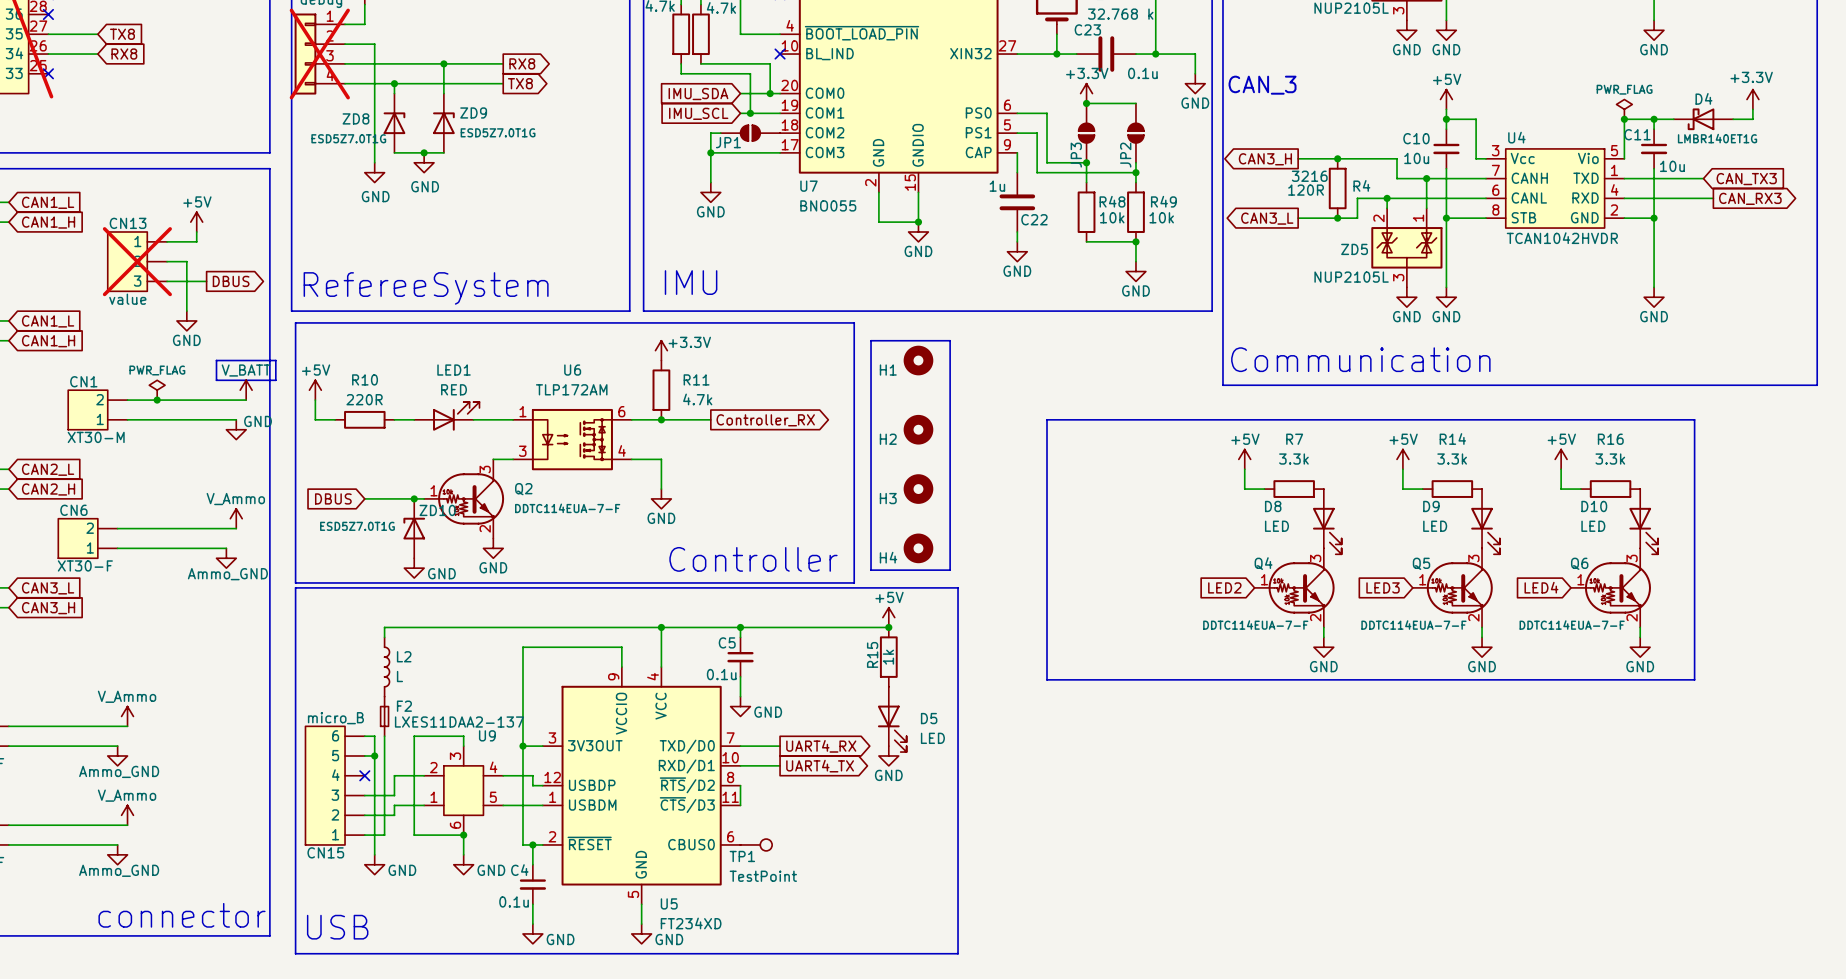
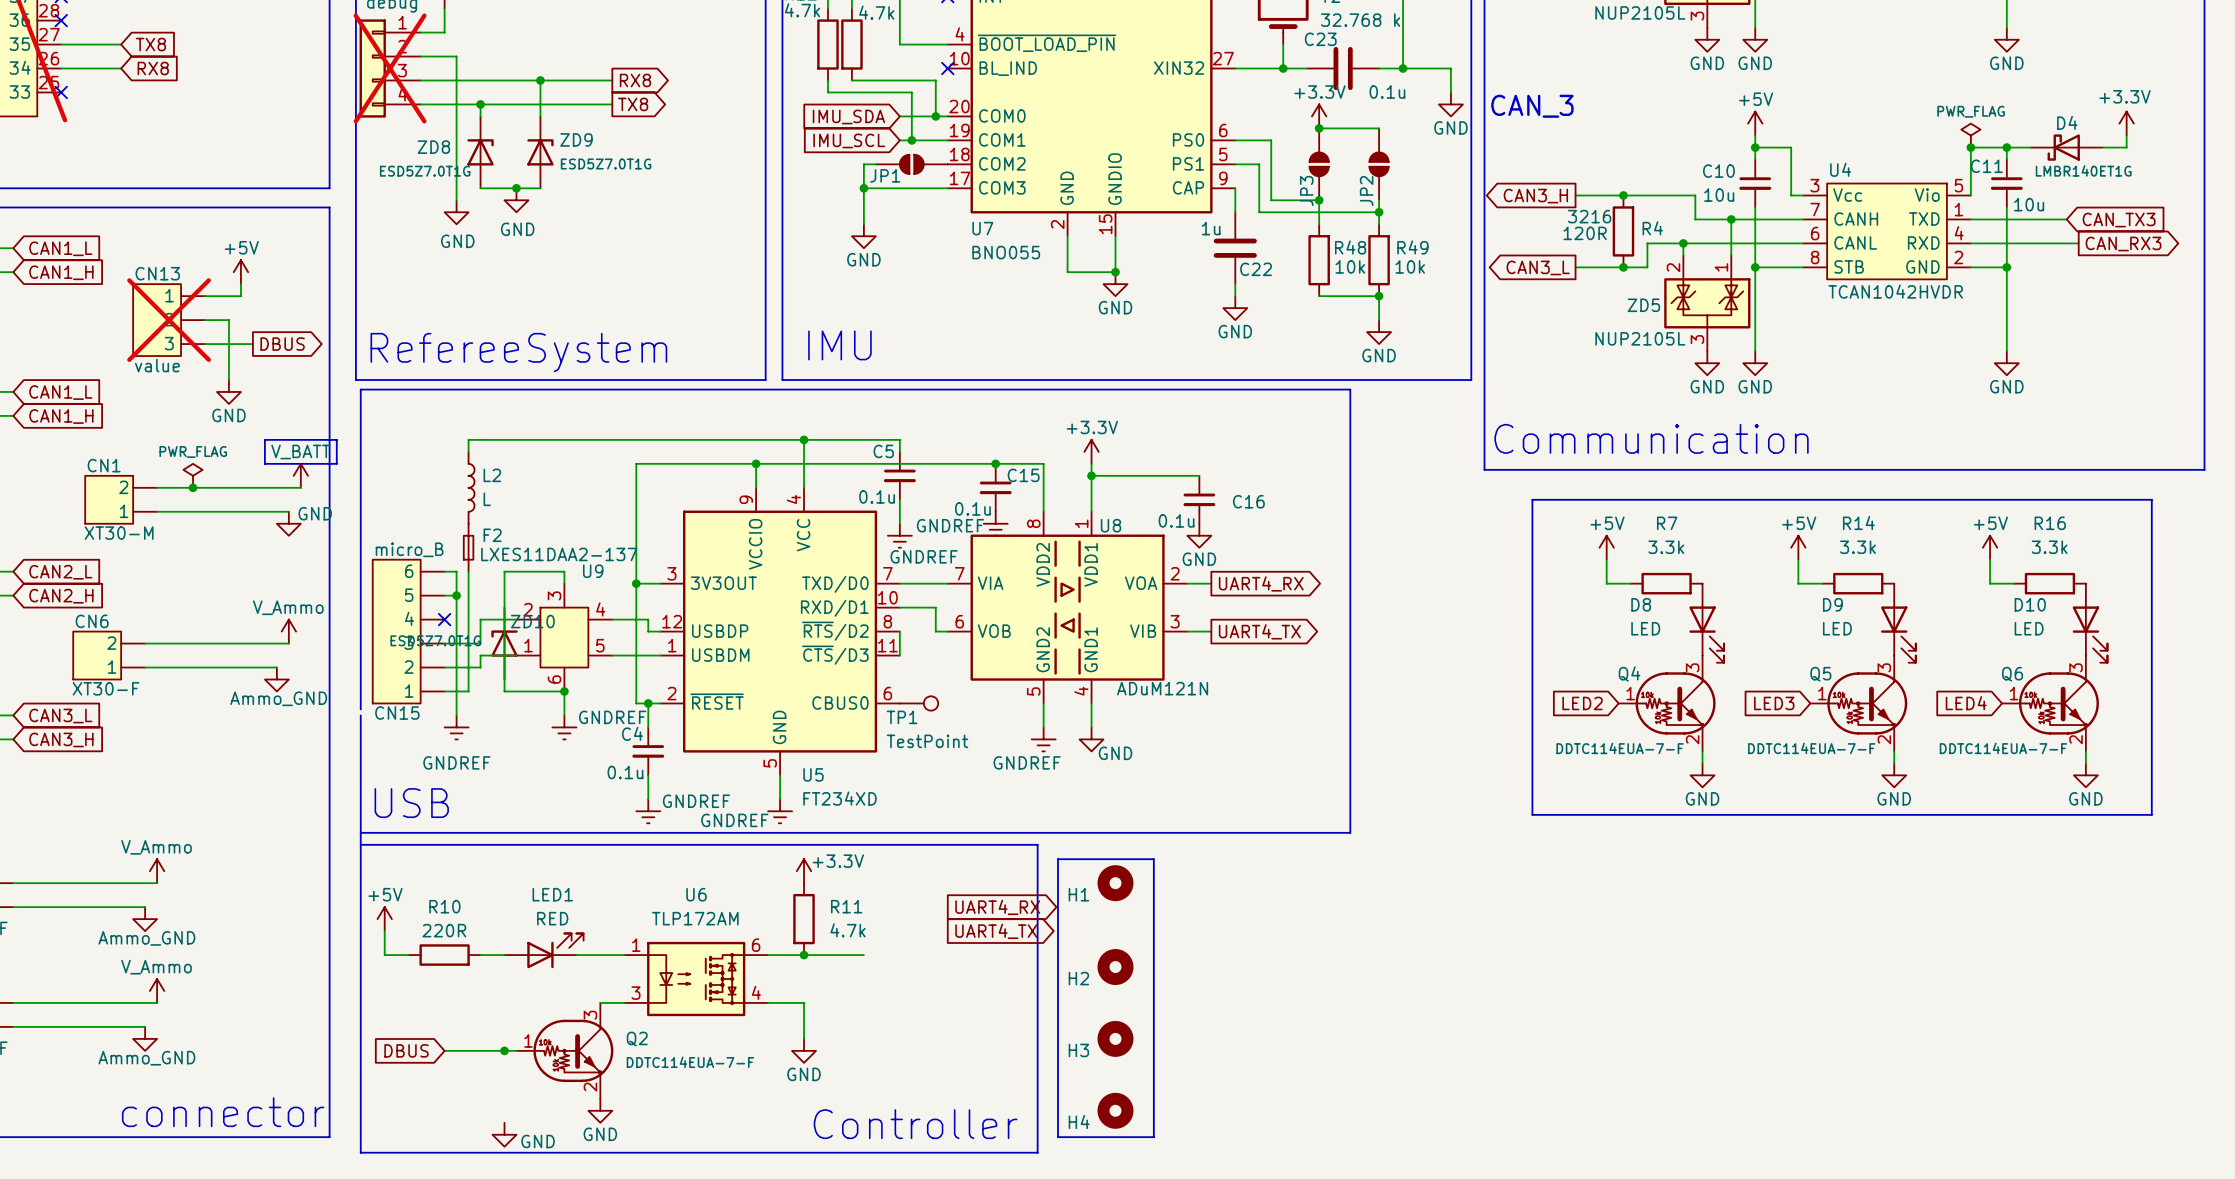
line: (295, 322) (854, 322) (854, 582) (295, 582) -> (360, 394) (360, 389) (1350, 389) (1350, 832) (360, 832)
line: (871, 340) (950, 340) (950, 570) (871, 570) (871, 340) -> none
power symbol: +3.3V (661, 350) -> none
wire: none -> (804, 439) (804, 487)
junction: none -> (804, 439)
H1 position: (918, 360) -> (1115, 883)
wire: none -> (468, 451) (468, 439) (899, 439) (899, 451)
power symbol: none -> +3.3V (1091, 451)
wire: none -> (756, 463) (756, 487)
junction: none -> (756, 463)
junction: none -> (995, 463)
wire: none -> (1091, 463) (1091, 511)
power symbol: +5V (315, 390) -> none
R11 position: (661, 390) -> (804, 919)
wire: none -> (1091, 475) (1199, 475)
junction: none -> (1091, 475)
wire: (315, 400) (315, 419) (335, 419) -> none
C15: none -> 0.1u (995, 487)
wire: none -> (899, 499) (899, 523)
C16: none -> 0.1u (1199, 499)
LED1 position: (446, 416) -> (544, 950)
R10 position: (364, 419) -> (444, 955)
wire: (394, 419) (414, 419) -> none
wire: (473, 419) (513, 419) -> (612, 655) (660, 655)
junction: (661, 419) -> none
wire: none -> (1043, 511) (1043, 463) (636, 463) (636, 703) (660, 703)
line: (1047, 419) (1694, 419) (1694, 679) (1047, 679) (1047, 419) -> (1532, 499) (1532, 814) (2151, 814) (2151, 499) (1532, 499)
global label: Controller_RX (765, 420) -> none
power symbol: none -> GNDREF (995, 523)
H2 position: (918, 429) -> (1115, 967)
U6 position: (572, 439) -> (696, 979)
power symbol: none -> GNDREF (899, 535)
power symbol: none -> GND (1199, 535)
power symbol: none -> +5V (1606, 547)
power symbol: none -> +5V (1798, 547)
power symbol: none -> +5V (1990, 547)
wire: (493, 459) (513, 459) -> (636, 583) (660, 583)
power symbol: +5V (1244, 459) -> none
power symbol: +5V (1402, 459) -> none
power symbol: +5V (1561, 459) -> none
wire: none -> (444, 571) (456, 571) (456, 715)
wire: none -> (468, 571) (468, 691) (444, 691)
wire: (1244, 469) (1244, 489) (1264, 489) -> (1606, 559) (1606, 583) (1630, 583)
wire: (1402, 469) (1402, 489) (1422, 489) -> (1798, 559) (1798, 583) (1822, 583)
wire: (1561, 469) (1561, 489) (1580, 489) -> (1990, 559) (1990, 583) (2014, 583)
wire: none -> (564, 583) (564, 571) (504, 571) (504, 691) (564, 691) (564, 715)
junction: none -> (636, 583)
wire: none -> (899, 583) (947, 583)
wire: none -> (1187, 583) (1211, 583)
global label: none -> UART4_RX (1261, 583)
wire: none -> (444, 595) (456, 595)
H3 position: (918, 489) -> (1115, 1038)
R7 position: (1294, 489) -> (1666, 583)
R14 position: (1452, 489) -> (1858, 583)
R16 position: (1610, 489) -> (2049, 583)
global label: DBUS (333, 498) -> none
wire: (364, 498) (424, 498) -> none
junction position: (414, 498) -> (456, 595)
Q2 position: (464, 498) -> (564, 1050)
power symbol: GND (661, 498) -> none
wire: none -> (899, 607) (935, 607) (935, 631) (947, 631)
U8: none -> ADuM121N (1067, 607)
no-connect mark: none -> (444, 619)
wire: none -> (516, 619) (480, 619) (480, 643) (444, 643)
wire: none -> (612, 619) (648, 619) (648, 631) (660, 631)
wire: none -> (899, 631) (899, 655)
wire: none -> (1187, 631) (1211, 631)
global label: none -> UART4_TX (1259, 631)
D8 position: (1327, 521) -> (1706, 623)
D9 position: (1485, 521) -> (1898, 623)
D10 position: (1643, 521) -> (2090, 623)
wire: none -> (516, 655) (480, 655) (480, 667) (444, 667)
power symbol: GND (493, 548) -> none
H4 position: (918, 548) -> (1115, 1110)
text: Controller (753, 559) -> none
power symbol: GND (414, 568) -> none
junction: none -> (564, 691)
wire: none -> (648, 703) (648, 727)
junction: none -> (648, 703)
wire: none -> (1043, 703) (1043, 727)
wire: none -> (1091, 703) (1091, 727)
line: (295, 587) (958, 587) (958, 953) (295, 953) (295, 948) -> (360, 844) (1037, 844) (1037, 1152) (360, 1152)
global label position: LED2 (1224, 587) -> LED2 (1582, 703)
Q4 position: (1294, 587) -> (1667, 703)
global label position: LED3 (1383, 587) -> LED3 (1774, 703)
Q5 position: (1452, 587) -> (1858, 703)
global label position: LED4 (1541, 587) -> LED4 (1966, 703)
Q6 position: (1610, 587) -> (2050, 703)
power symbol: none -> GNDREF (456, 727)
power symbol: none -> GNDREF (564, 727)
power symbol: none -> GNDREF (1043, 739)
power symbol: none -> GND (1091, 739)
power symbol: +5V (888, 617) -> none
wire: (661, 627) (661, 667) -> none
junction: (661, 627) -> none
wire: (740, 627) (740, 637) -> none
junction: (740, 627) -> none
wire: (888, 627) (384, 627) (384, 637) -> none
junction: (888, 627) -> none
wire: (1323, 627) (1323, 637) -> (1702, 751) (1702, 763)
wire: (1482, 627) (1482, 637) -> (1894, 751) (1894, 763)
wire: (1640, 627) (1640, 637) -> (2085, 751) (2085, 763)
wire: none -> (648, 775) (648, 799)
power symbol: none -> GND (1702, 775)
power symbol: none -> GND (1894, 775)
power symbol: none -> GND (2085, 775)
C5 name position: C5 (727, 642) -> C5 (883, 451)
power symbol: GND (1323, 647) -> none
power symbol: GND (1482, 647) -> none
power symbol: GND (1640, 647) -> none
C5 position: (740, 657) -> (899, 475)
R15: 1k (888, 657) -> none
text: none -> USB (411, 803)
L2 position: (387, 667) -> (471, 487)
power symbol: none -> GNDREF (648, 811)
wire: (621, 667) (621, 647) (522, 647) (522, 844) (542, 844) -> none
power symbol: none -> GNDREF (780, 811)
wire: (740, 676) (740, 696) -> (780, 775) (780, 799)
power symbol: GND (740, 706) -> none
line: none -> (1057, 859) (1153, 859) (1153, 1137) (1057, 1137) (1057, 859)
F2 position: (384, 716) -> (468, 547)
power symbol: none -> +3.3V (804, 871)
D5: LED (892, 719) -> none
wire: (364, 736) (374, 736) (374, 854) -> none
wire: (384, 736) (384, 835) (364, 835) -> none
wire: (463, 746) (463, 736) (414, 736) (414, 835) (463, 835) (463, 854) -> none
wire: (522, 746) (542, 746) -> (600, 1002) (624, 1002)
junction: (522, 746) -> none
wire: (740, 746) (780, 746) -> none
power symbol: none -> +5V (384, 919)
wire: (364, 756) (374, 756) -> none
junction: (374, 756) -> none
power symbol: GND (888, 756) -> none
wire: (740, 765) (780, 765) -> none
no-connect mark: (364, 775) -> none
wire: (424, 775) (394, 775) (394, 795) (364, 795) -> none
wire: (503, 775) (532, 775) (532, 785) (542, 785) -> none
CN15 position: (335, 785) -> (408, 631)
wire: none -> (480, 955) (504, 955)
U5 position: (641, 785) -> (780, 631)
junction: none -> (804, 955)
wire: (740, 785) (740, 805) -> none
U9 position: (463, 790) -> (564, 637)
wire: (424, 805) (394, 805) (394, 815) (364, 815) -> none
wire: (503, 805) (542, 805) -> (576, 955) (624, 955)
junction: (463, 835) -> none
wire: (532, 844) (532, 864) -> none
junction: (532, 844) -> none
TP1 position: (756, 844) -> (919, 703)
global label: none -> DBUS (406, 1050)
wire: none -> (444, 1050) (516, 1050)
power symbol: GND (374, 864) -> none
junction: none -> (504, 1050)
power symbol: GND (463, 864) -> none
C4 position: (532, 884) -> (648, 751)
wire: (532, 904) (532, 924) -> none
wire: (641, 904) (641, 924) -> none
power symbol: none -> GND (600, 1110)
text: none -> Controller (915, 1124)
text: USB (337, 927) -> none
power symbol: none -> GND (504, 1134)
power symbol: GND (532, 933) -> none
power symbol position: GND (641, 933) -> GND (804, 1050)
power symbol text position: GND (669, 939) -> GND (804, 1074)

